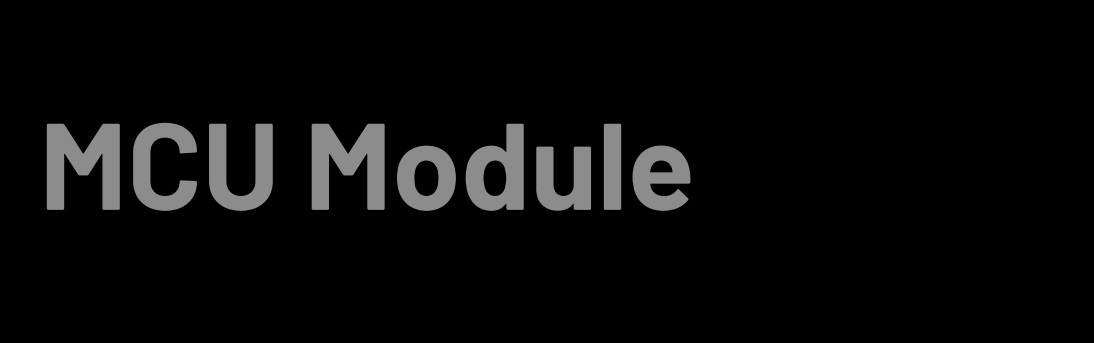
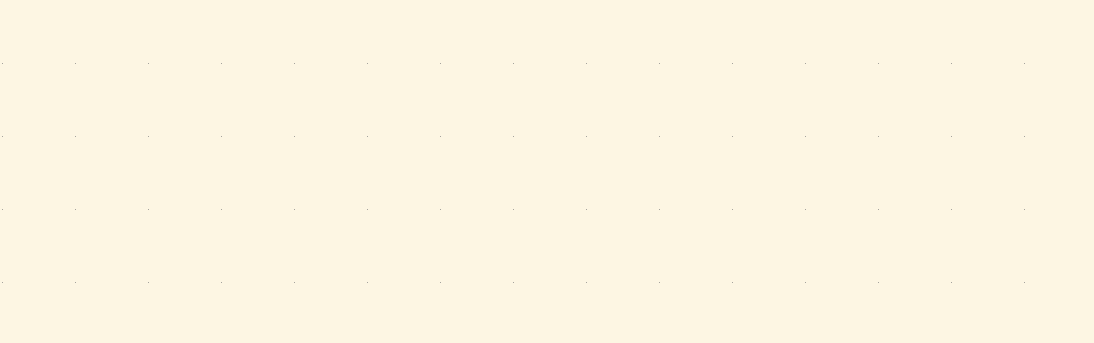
text: MCU Module (368, 166) -> none

